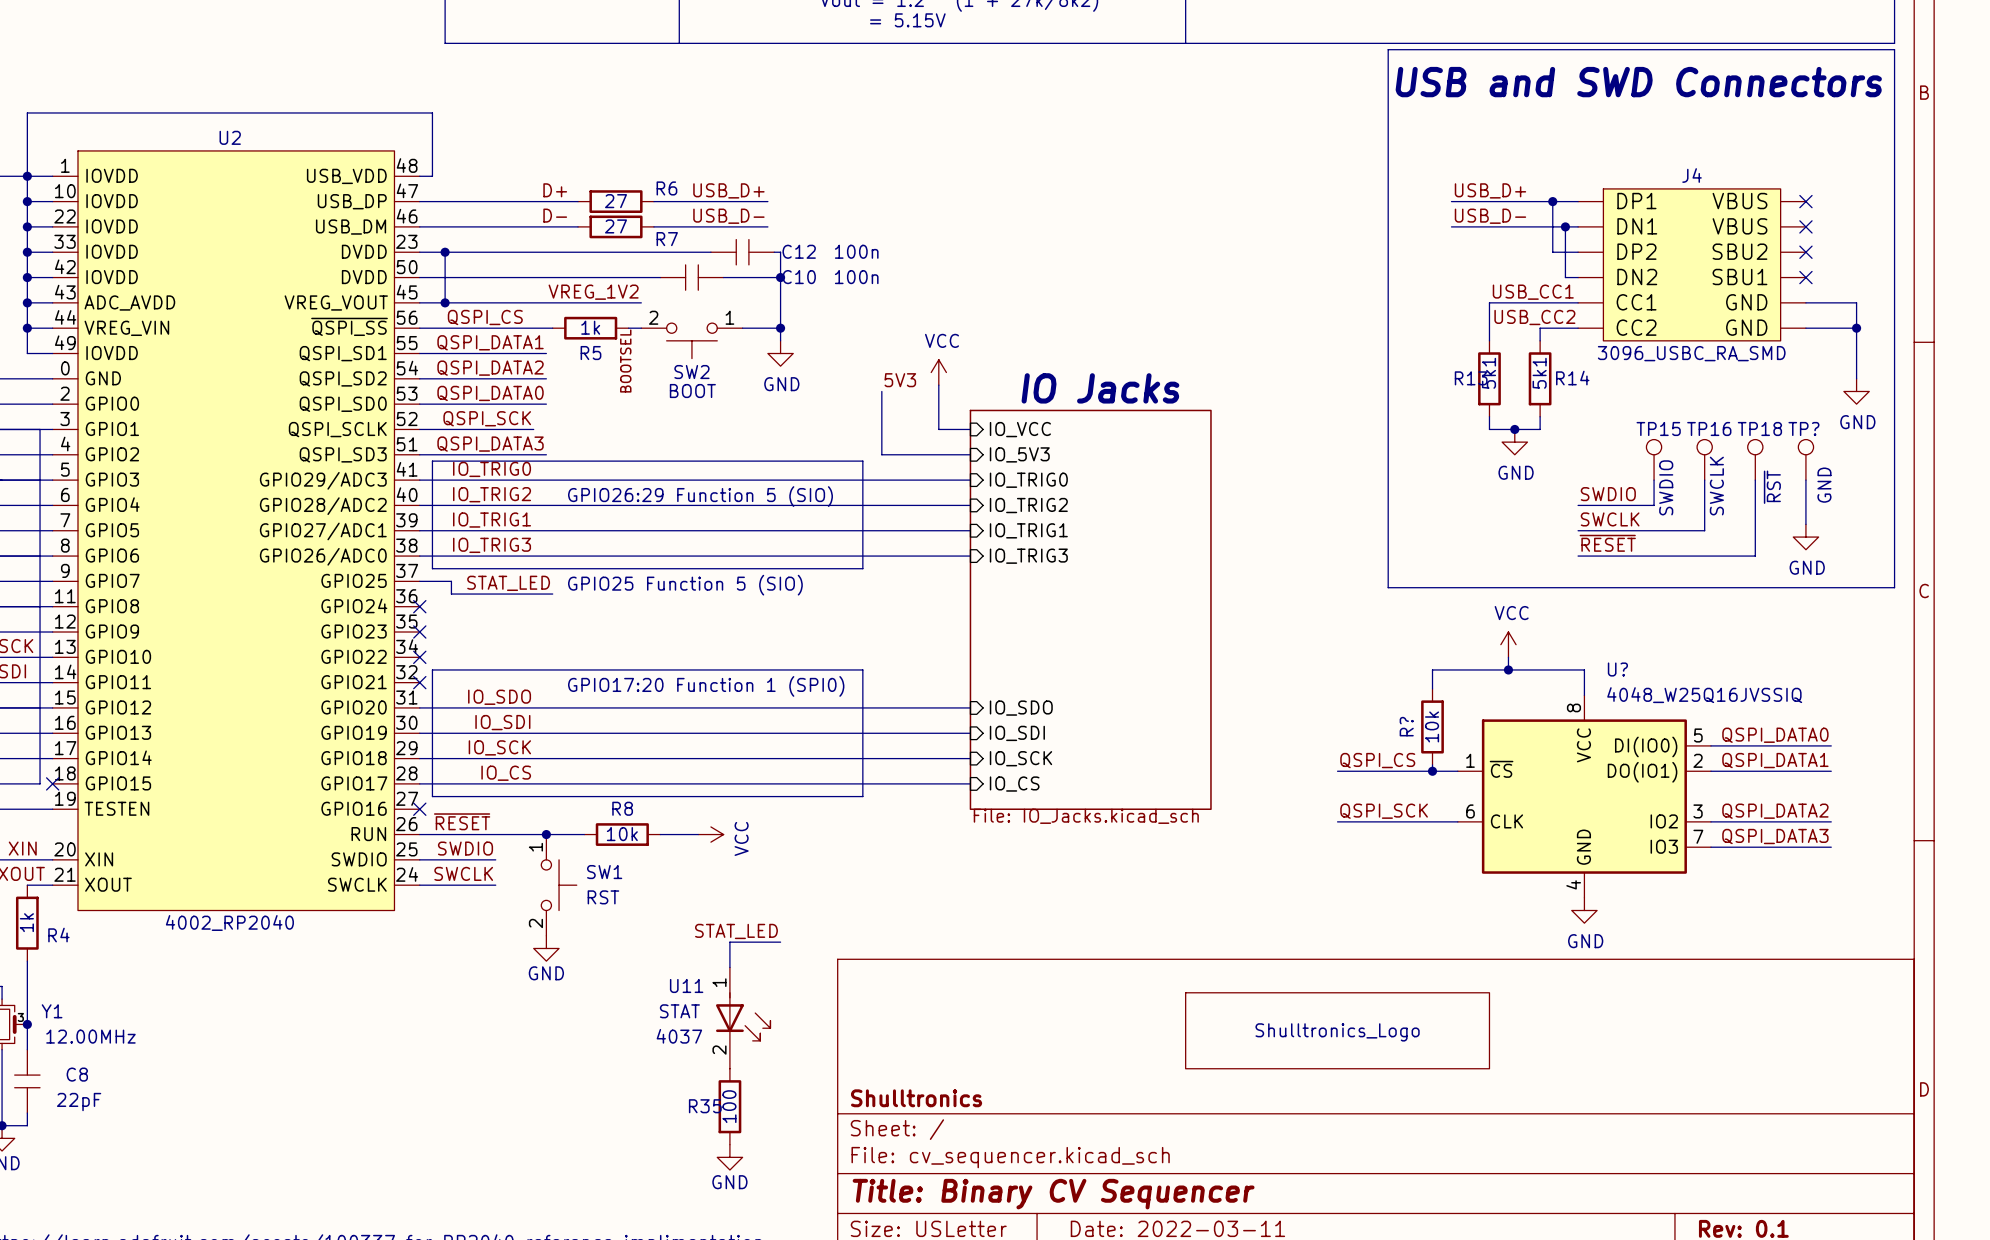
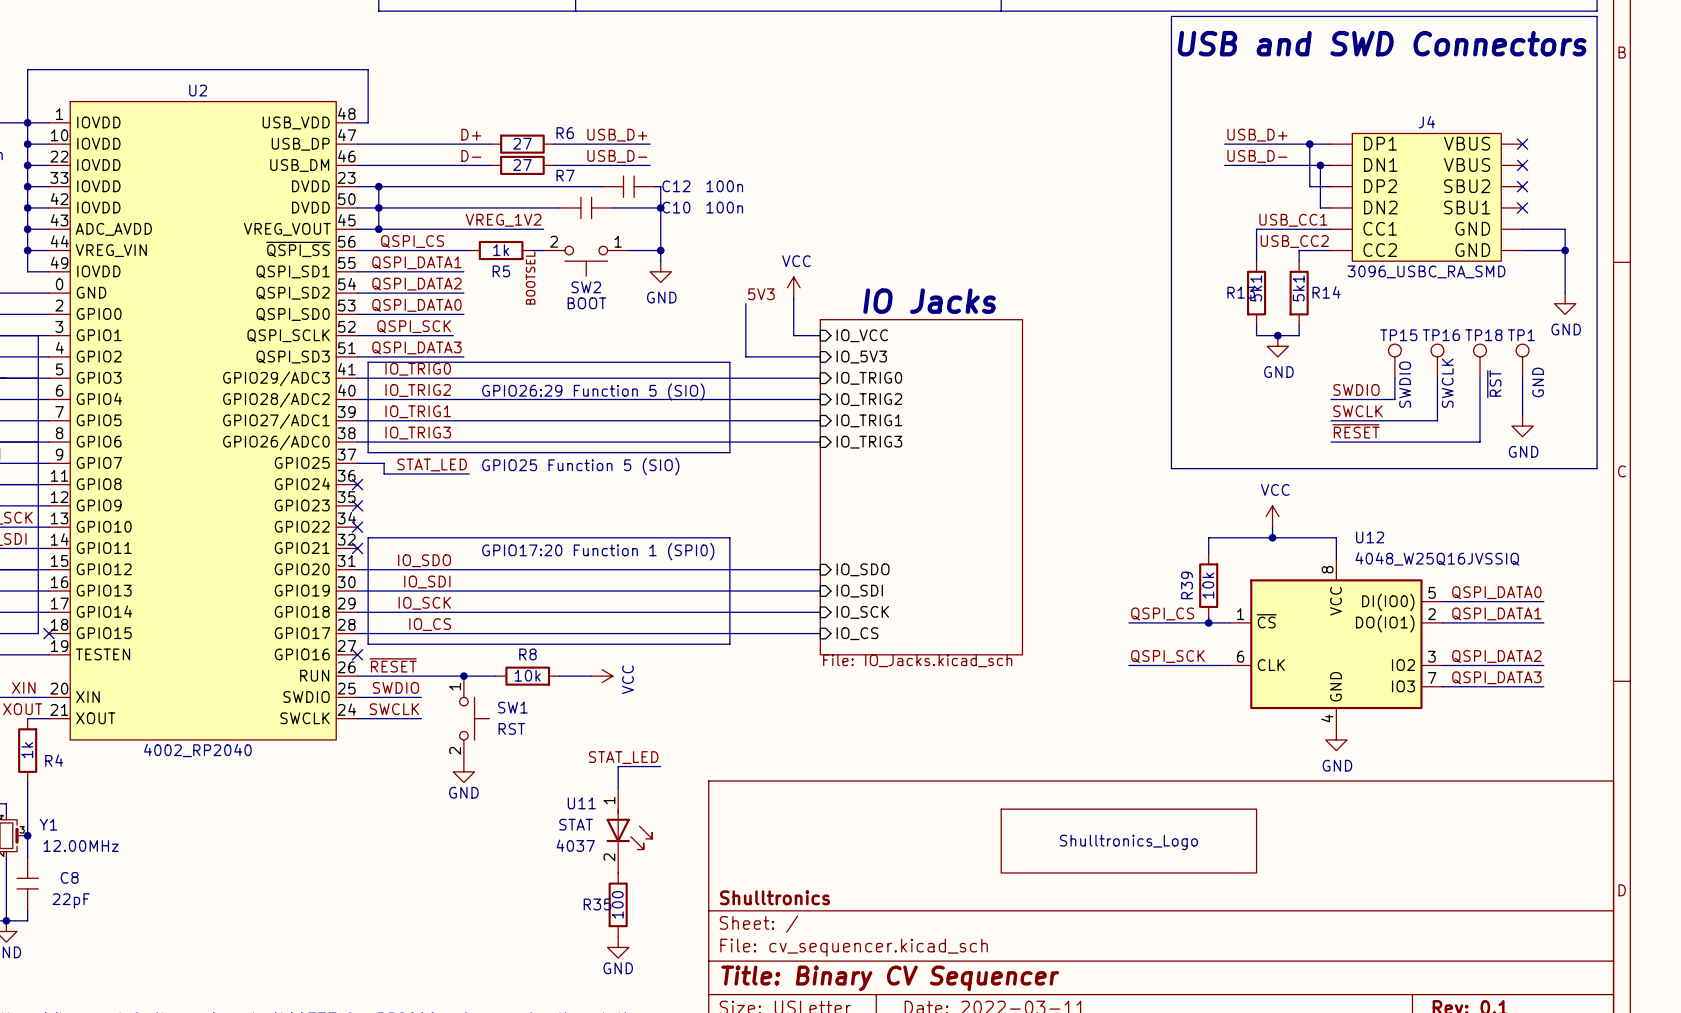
junction: none -> (378, 207)
TP? name: TP? (1803, 428) -> TP1 (1521, 335)
U? name: U? (1617, 669) -> U12 (1370, 537)
R? name: R? (1406, 726) -> R39 (1187, 585)

